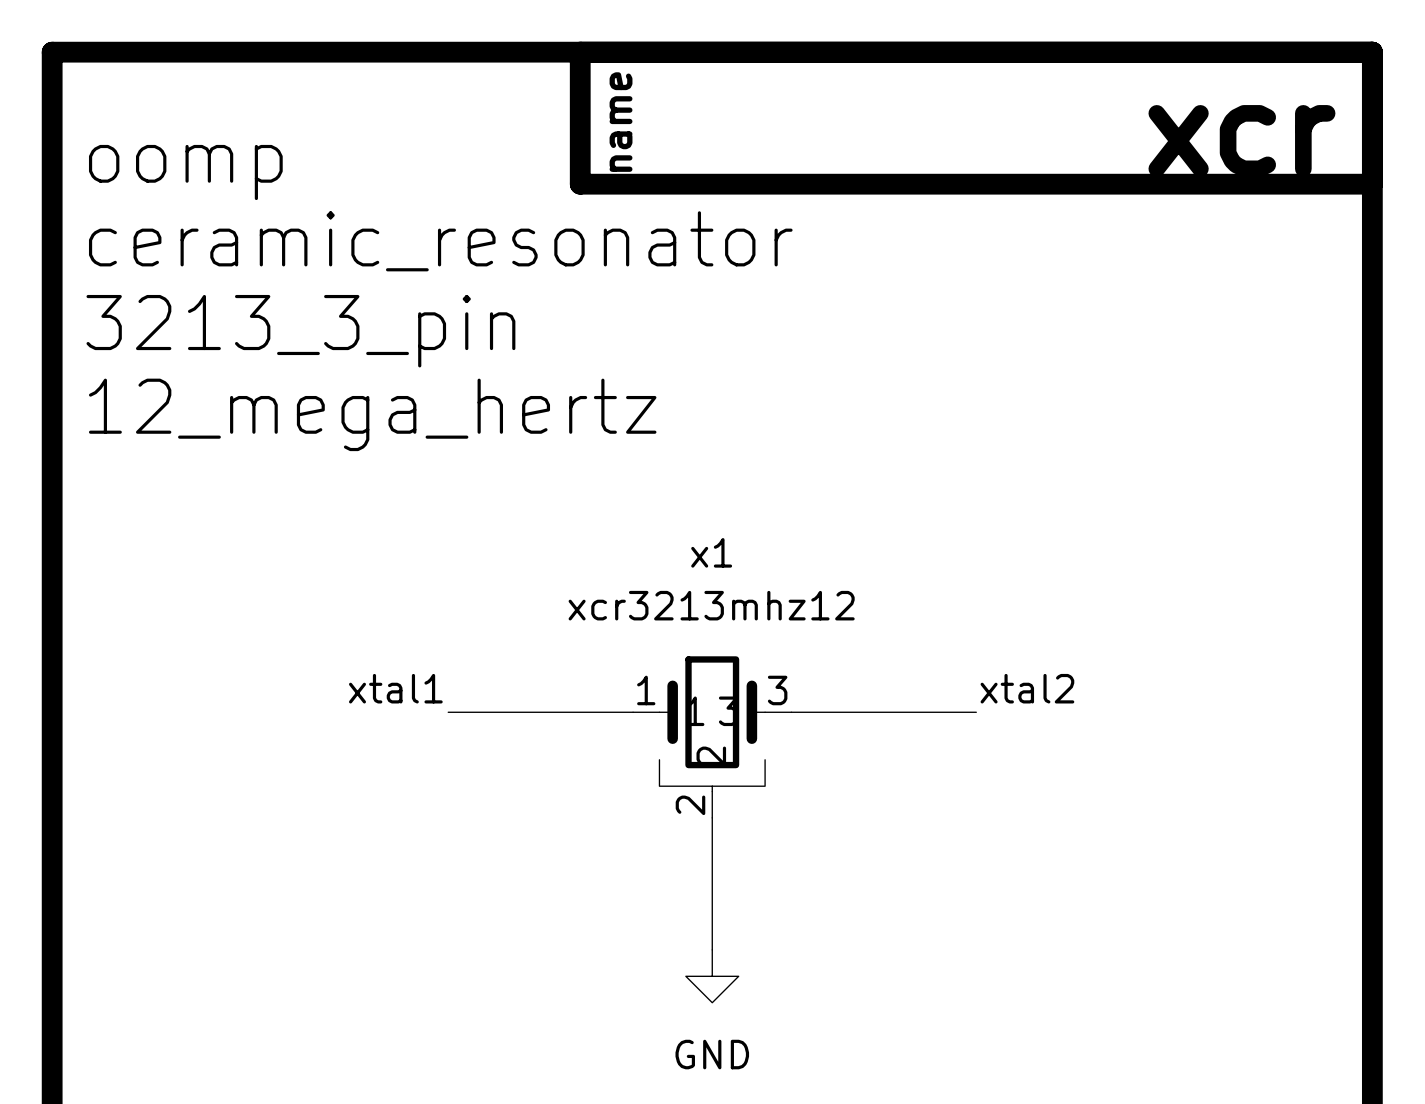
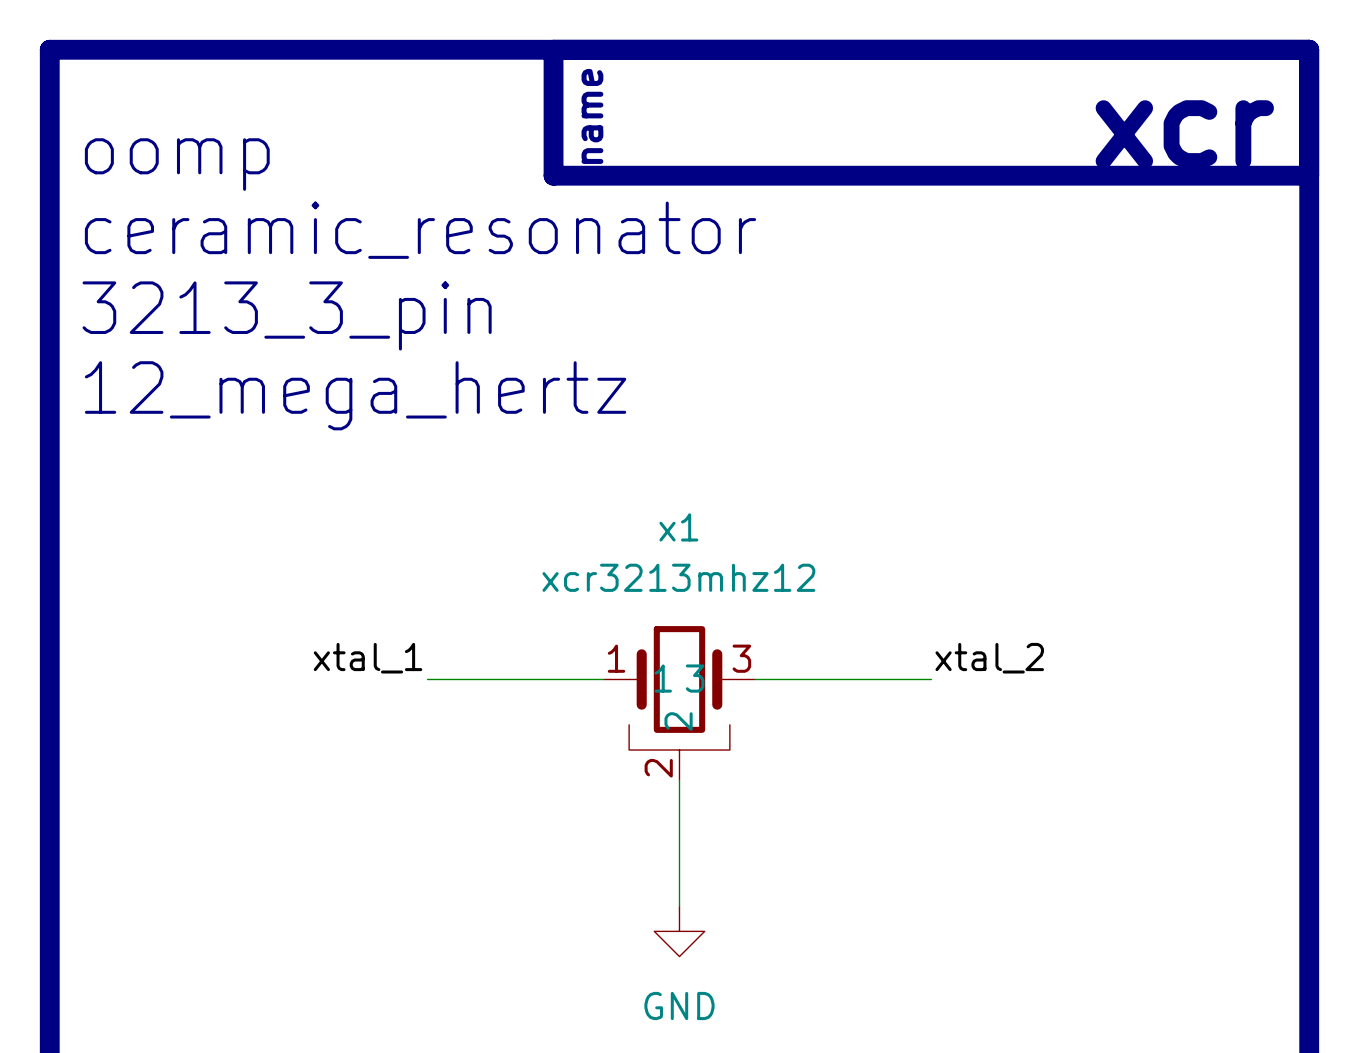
label: xtal1 (395, 688) -> xtal_1 (368, 658)
label: xtal2 (1027, 688) -> xtal_2 (989, 658)

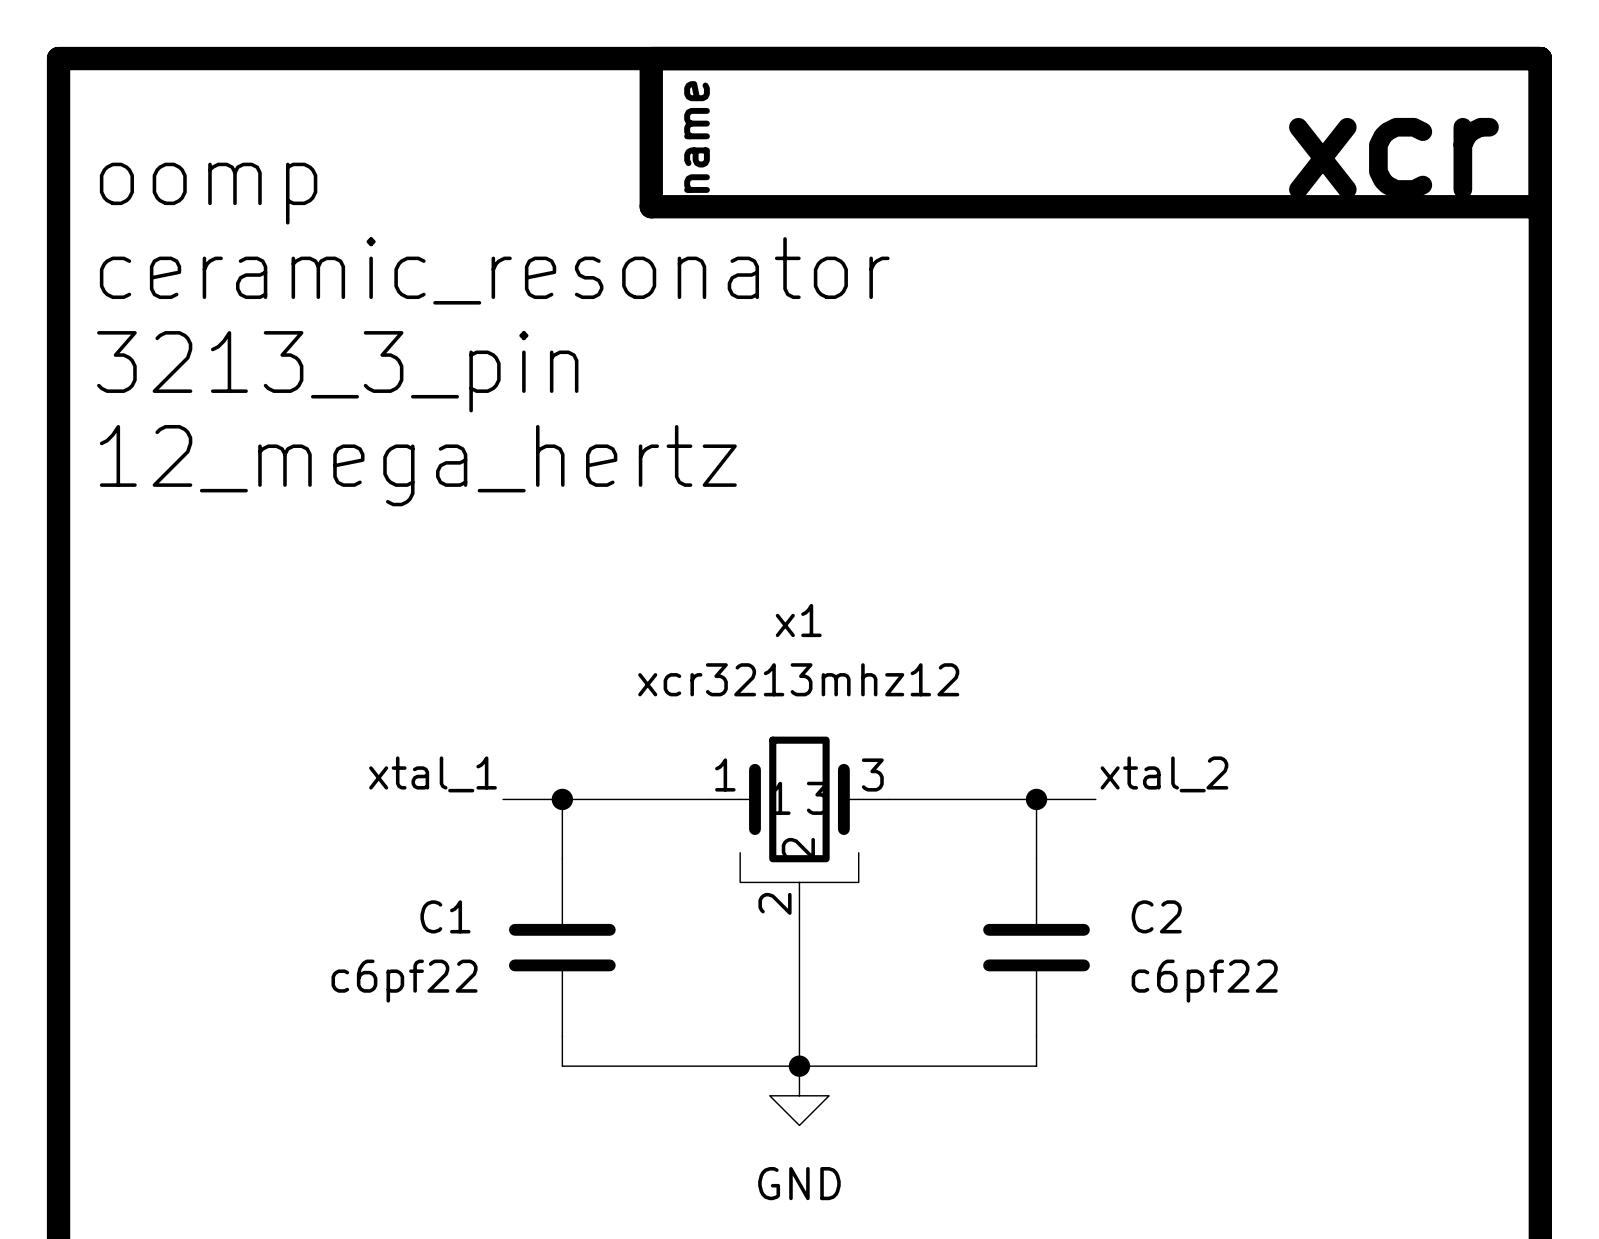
wire: none -> (562, 799) (562, 858)
junction: none -> (562, 799)
wire: none -> (1036, 799) (1036, 858)
junction: none -> (1036, 799)
C1: none -> c6pf22 (562, 947)
C2: none -> c6pf22 (1036, 947)
wire: none -> (562, 1036) (562, 1066) (1036, 1066) (1036, 1036)
junction: none -> (799, 1066)

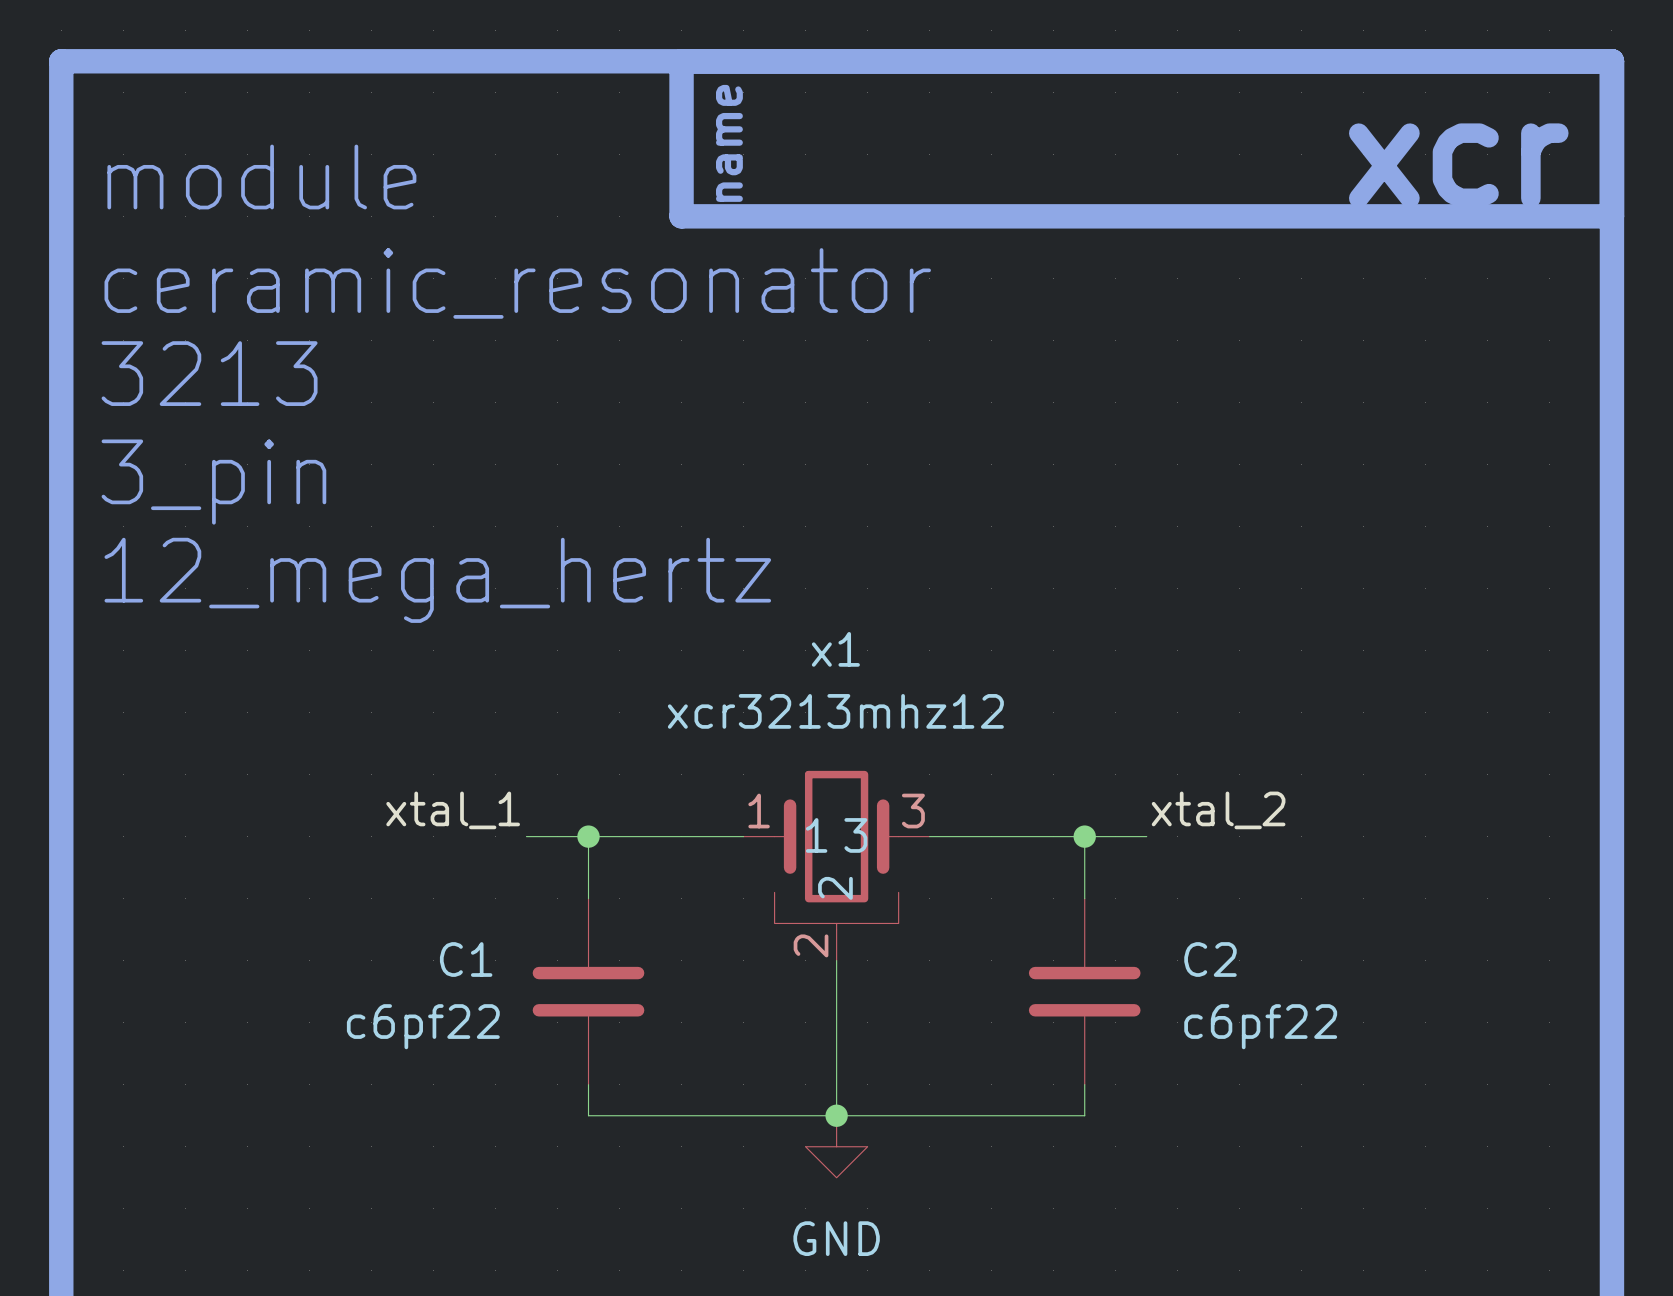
text: oomp (208, 193) -> module (261, 177)
text: 3213_3_pin (337, 371) -> 3213 (209, 373)
text: none -> 3_pin (213, 482)
text position: 12_mega_hertz (418, 465) -> 12_mega_hertz (437, 580)

